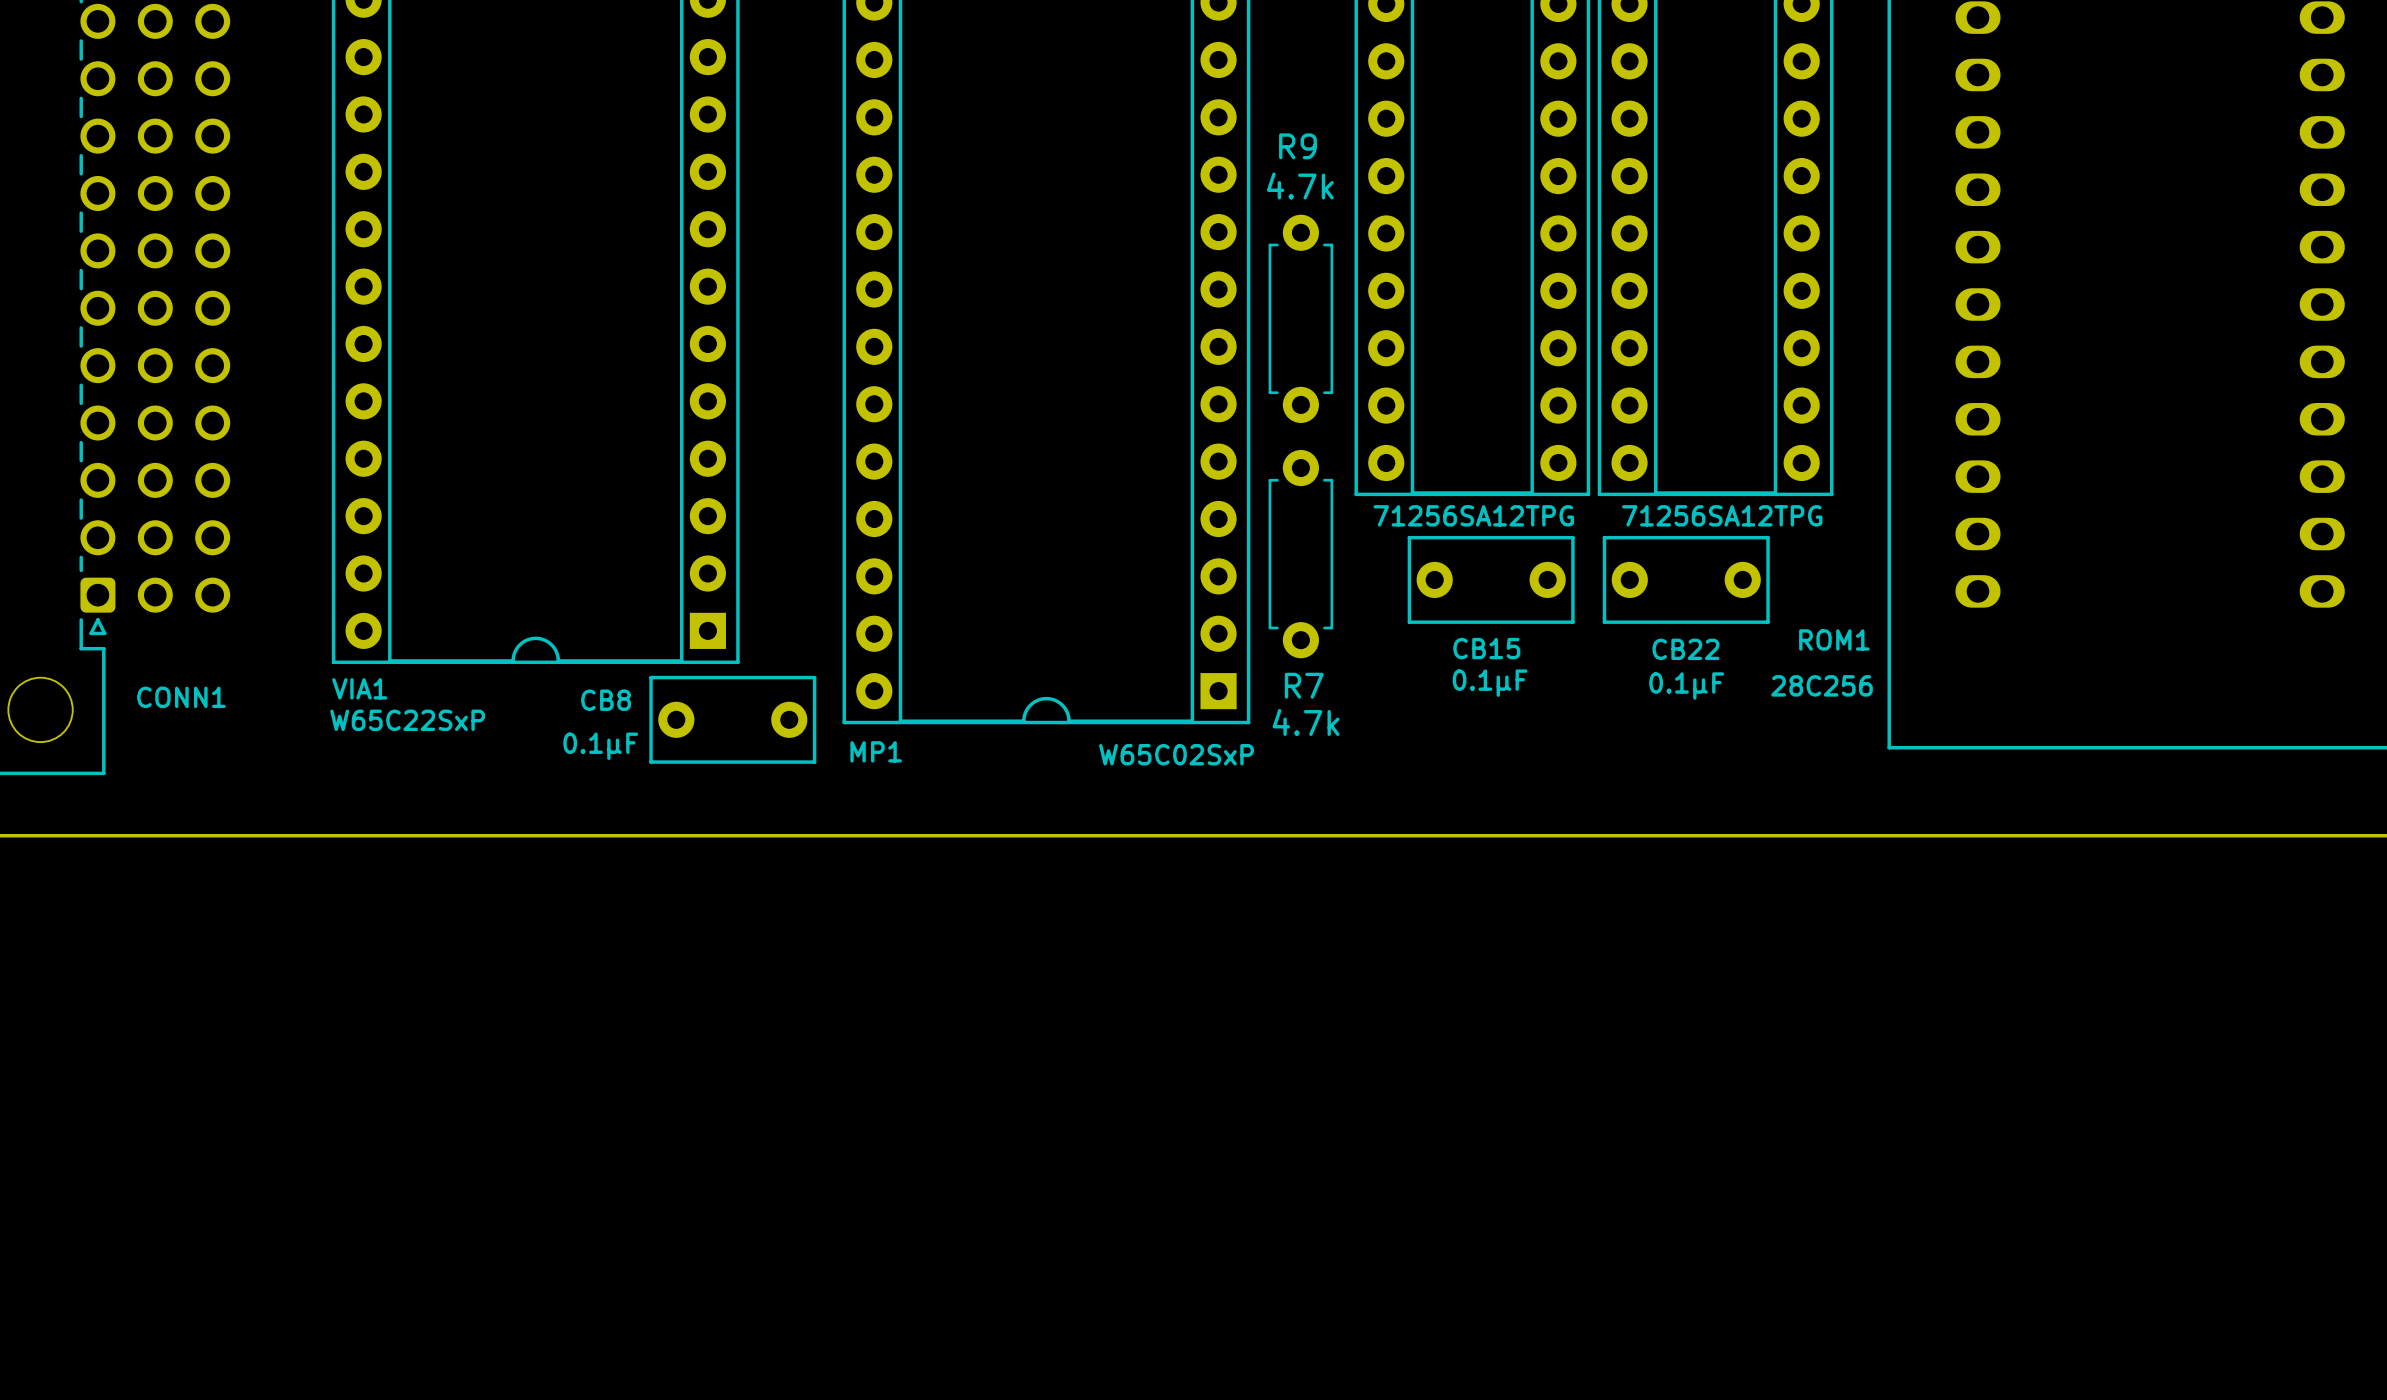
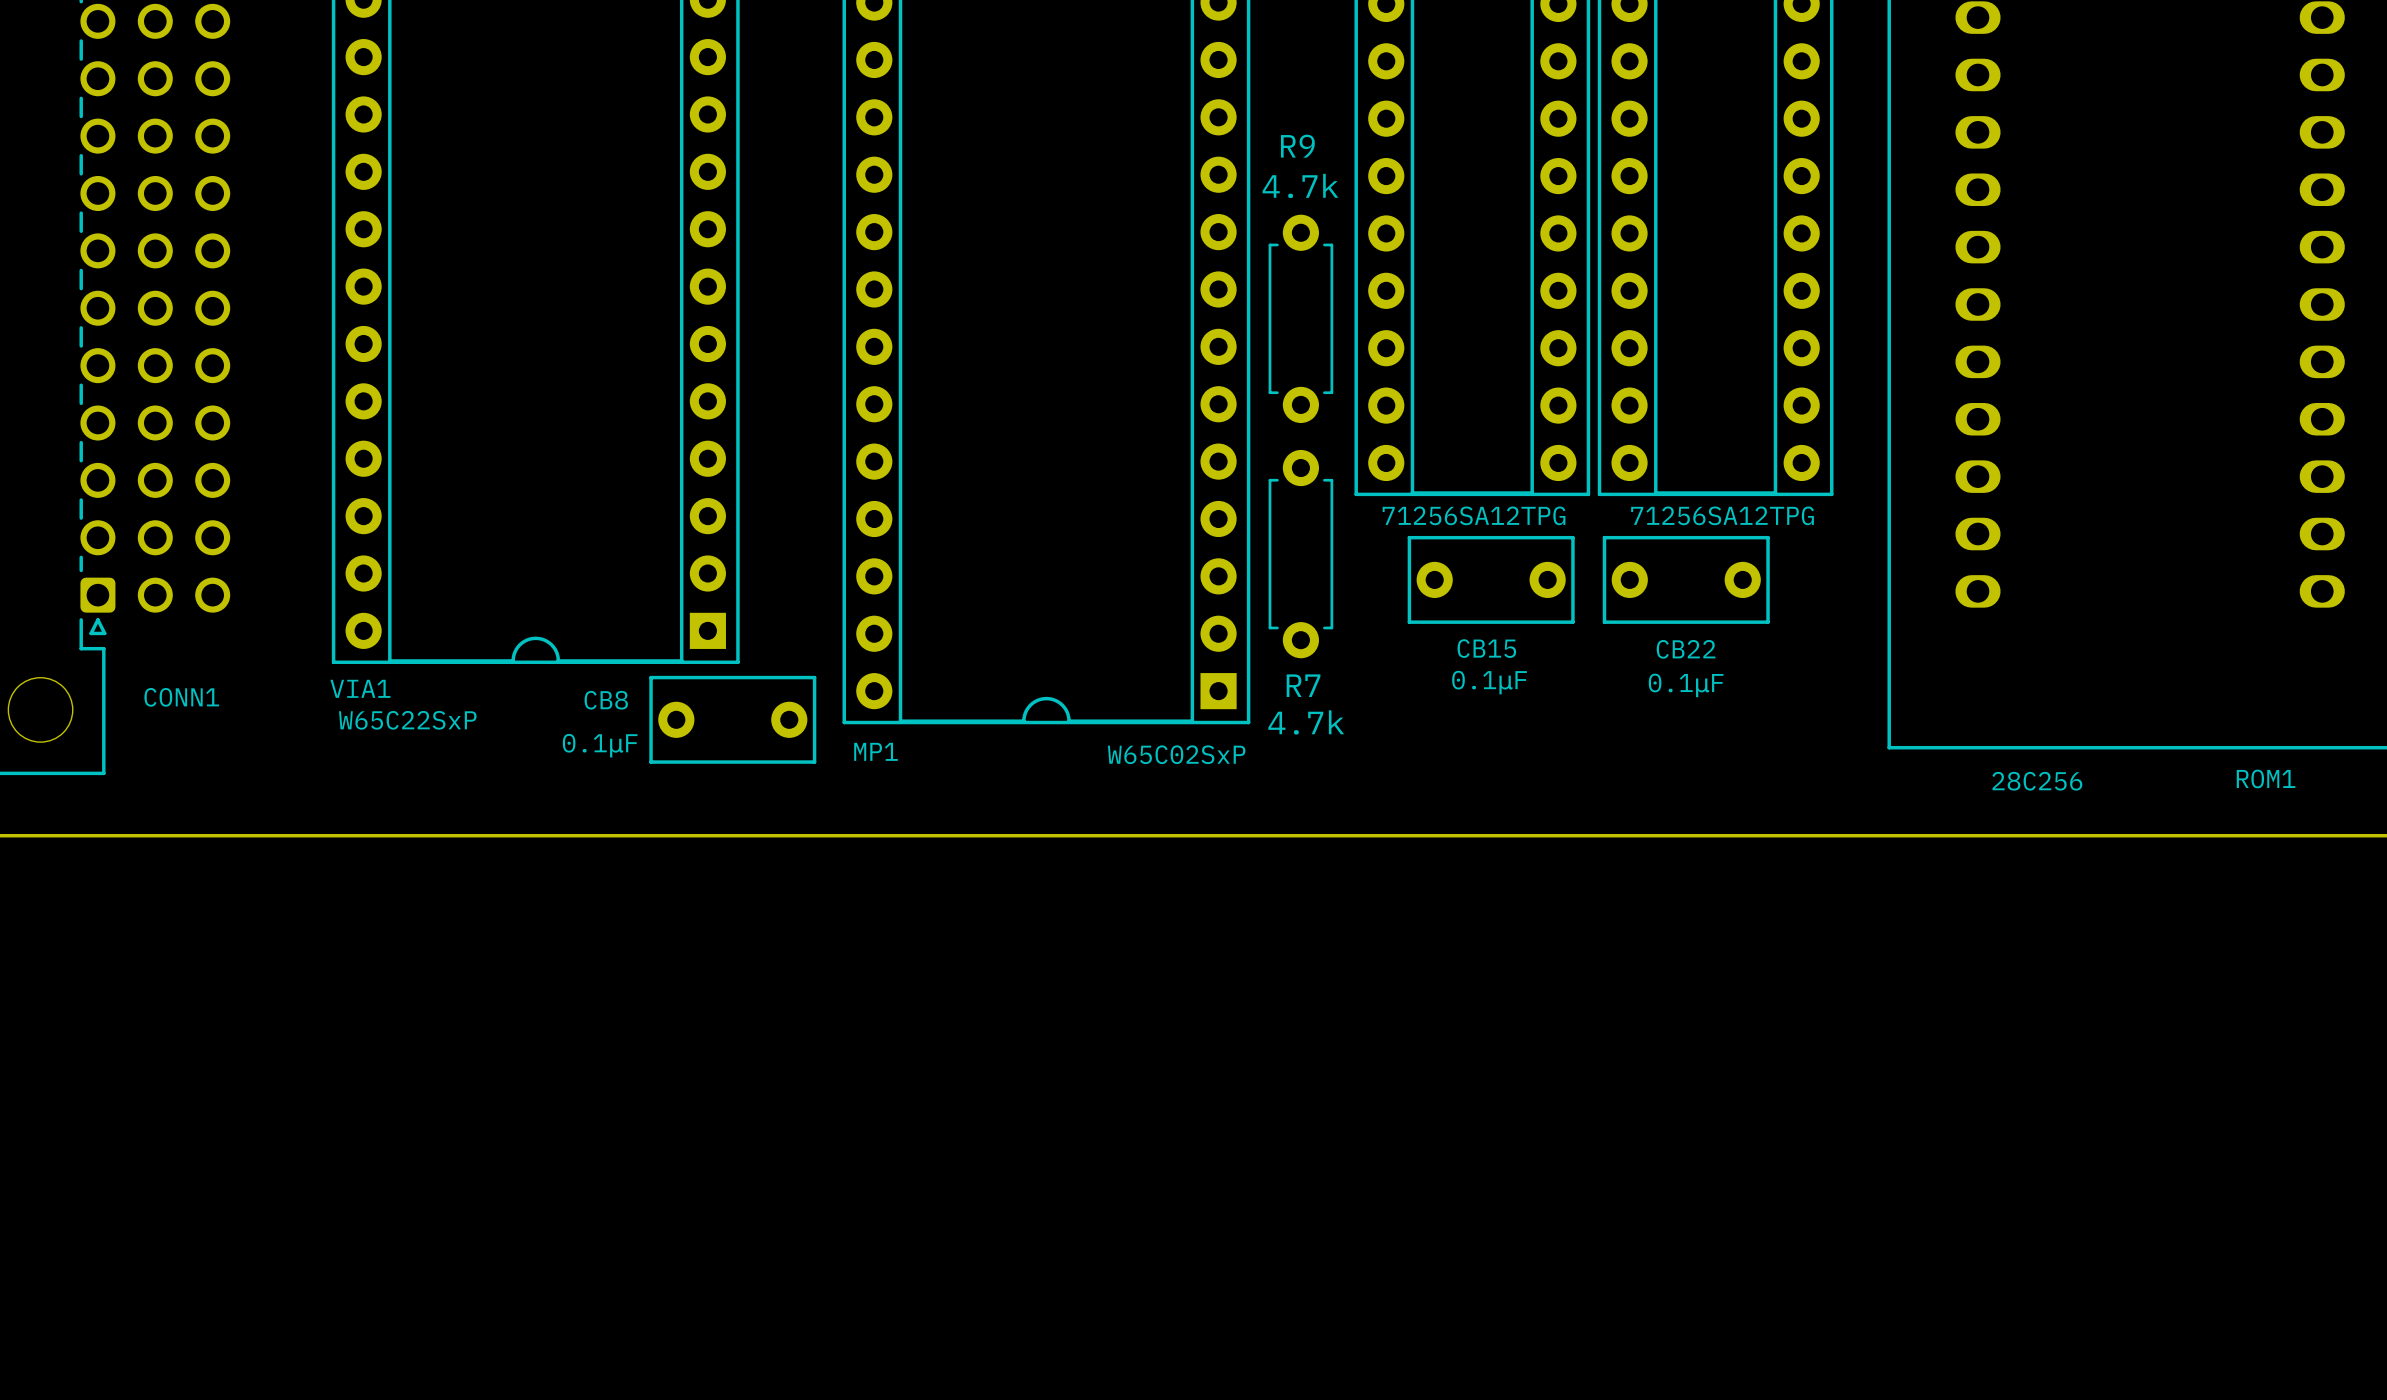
ROM1 name position: ROM1 (1834, 639) -> ROM1 (2266, 778)
ROM1 value position: 28C256 (1822, 685) -> 28C256 (2037, 781)

